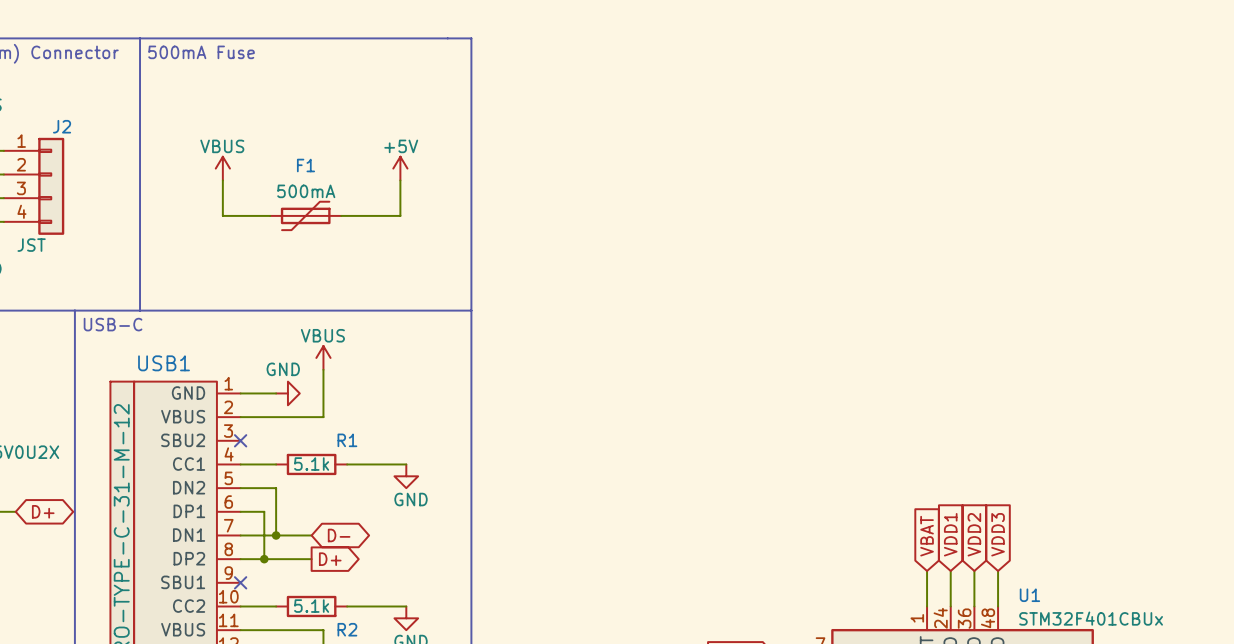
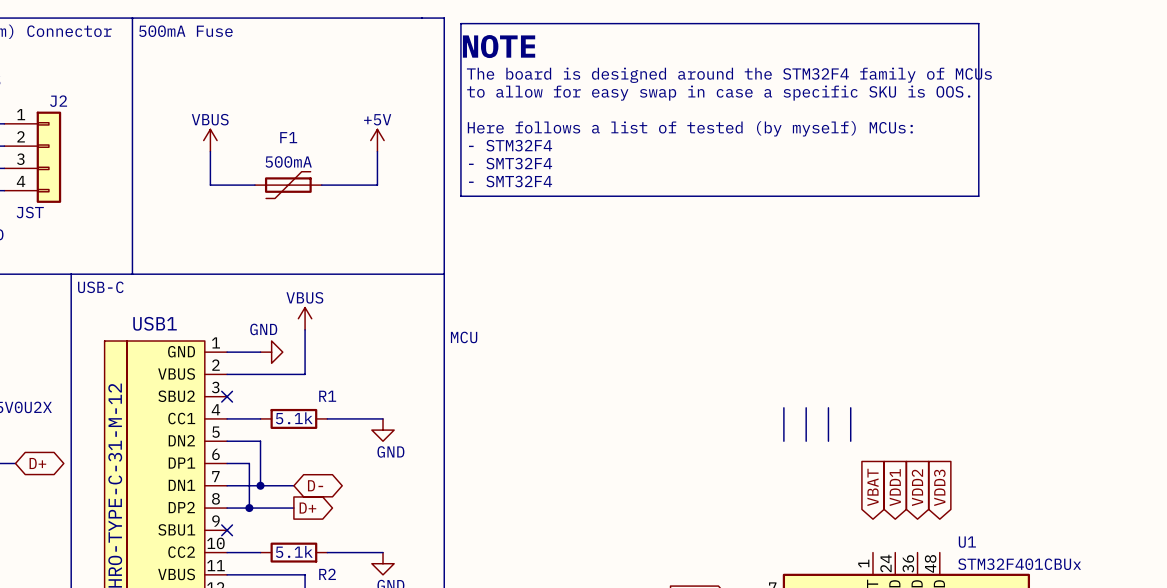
line: none -> (460, 23) (978, 23) (978, 196) (460, 196) (460, 23)
text: none -> NOTE (499, 46)
text: none -> The board is designed around the STM32F4 family of MCUs (729, 75)
text: none -> to allow for easy swap in case a specific SKU is OOS. (718, 93)
text: none -> Here follows a list of tested (by myself) MCUs: (690, 128)
text: none -> - STM32F4 (510, 145)
text: none -> - SMT32F4 (510, 163)
text: none -> - SMT32F4 (510, 181)
text: none -> MCU (464, 337)
wire: (927, 570) (927, 606) -> (783, 407) (783, 441)
wire: (950, 570) (950, 606) -> (806, 407) (806, 441)
wire: (974, 570) (974, 606) -> (828, 407) (828, 441)
wire: (998, 570) (998, 606) -> (850, 407) (850, 441)

